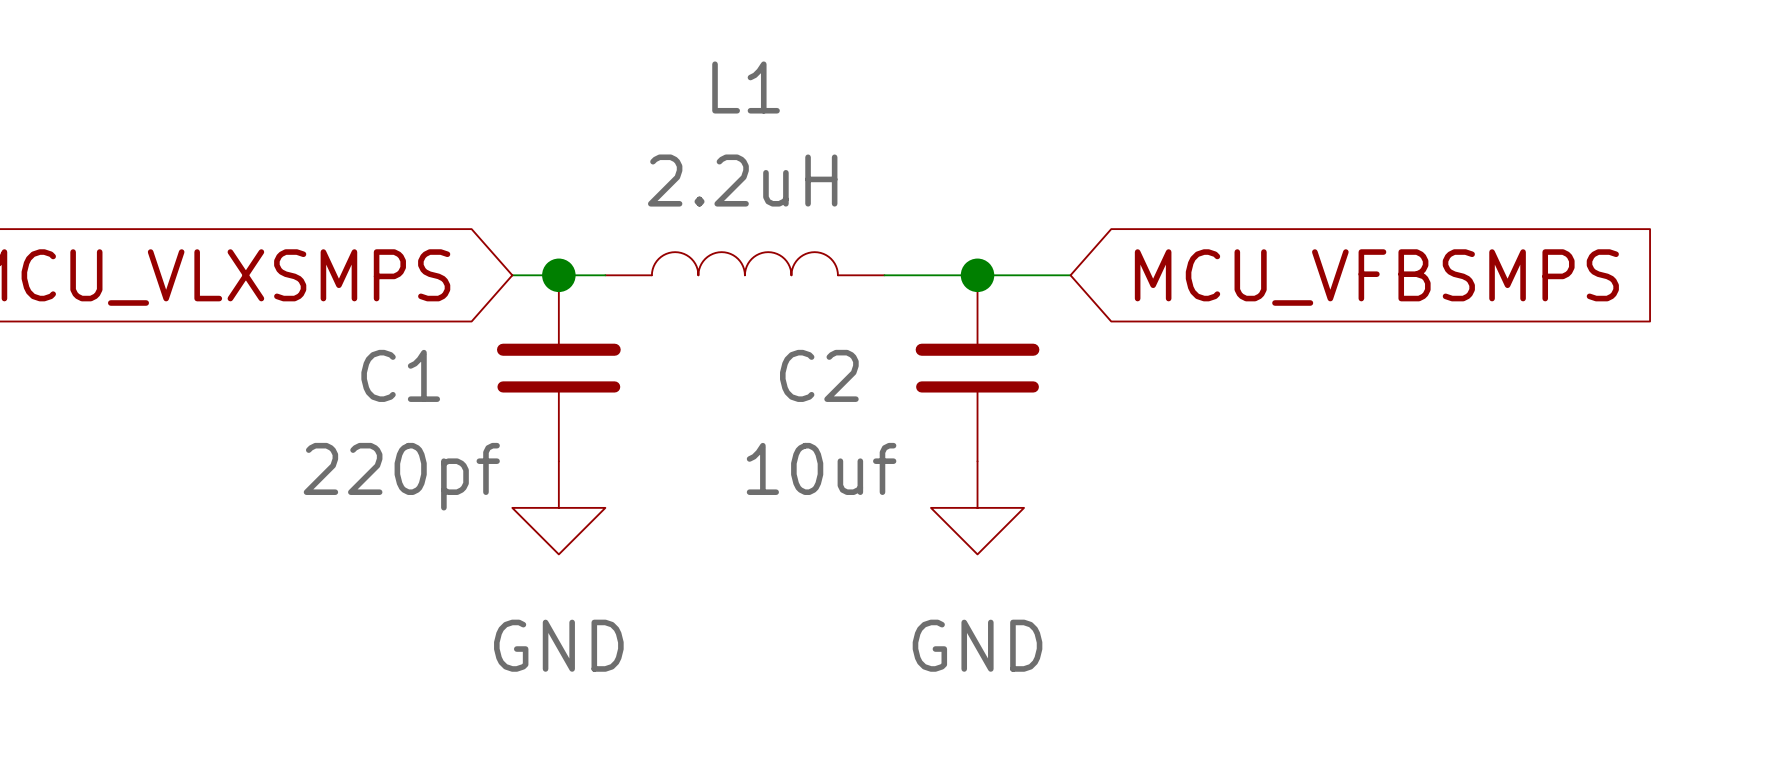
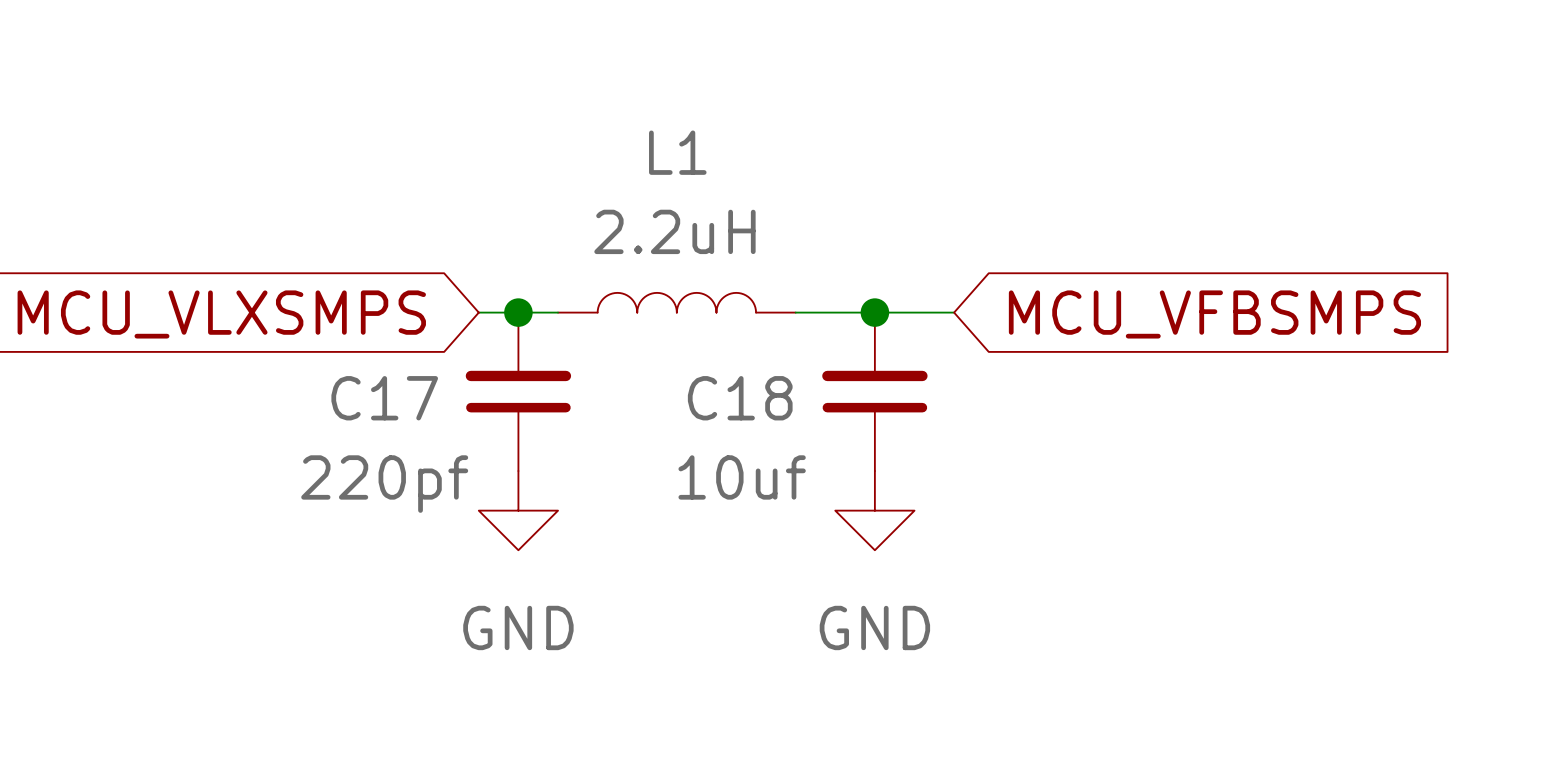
C1 name: C1 (400, 375) -> C17 (384, 398)
C2 name: C2 (819, 375) -> C18 (740, 398)

